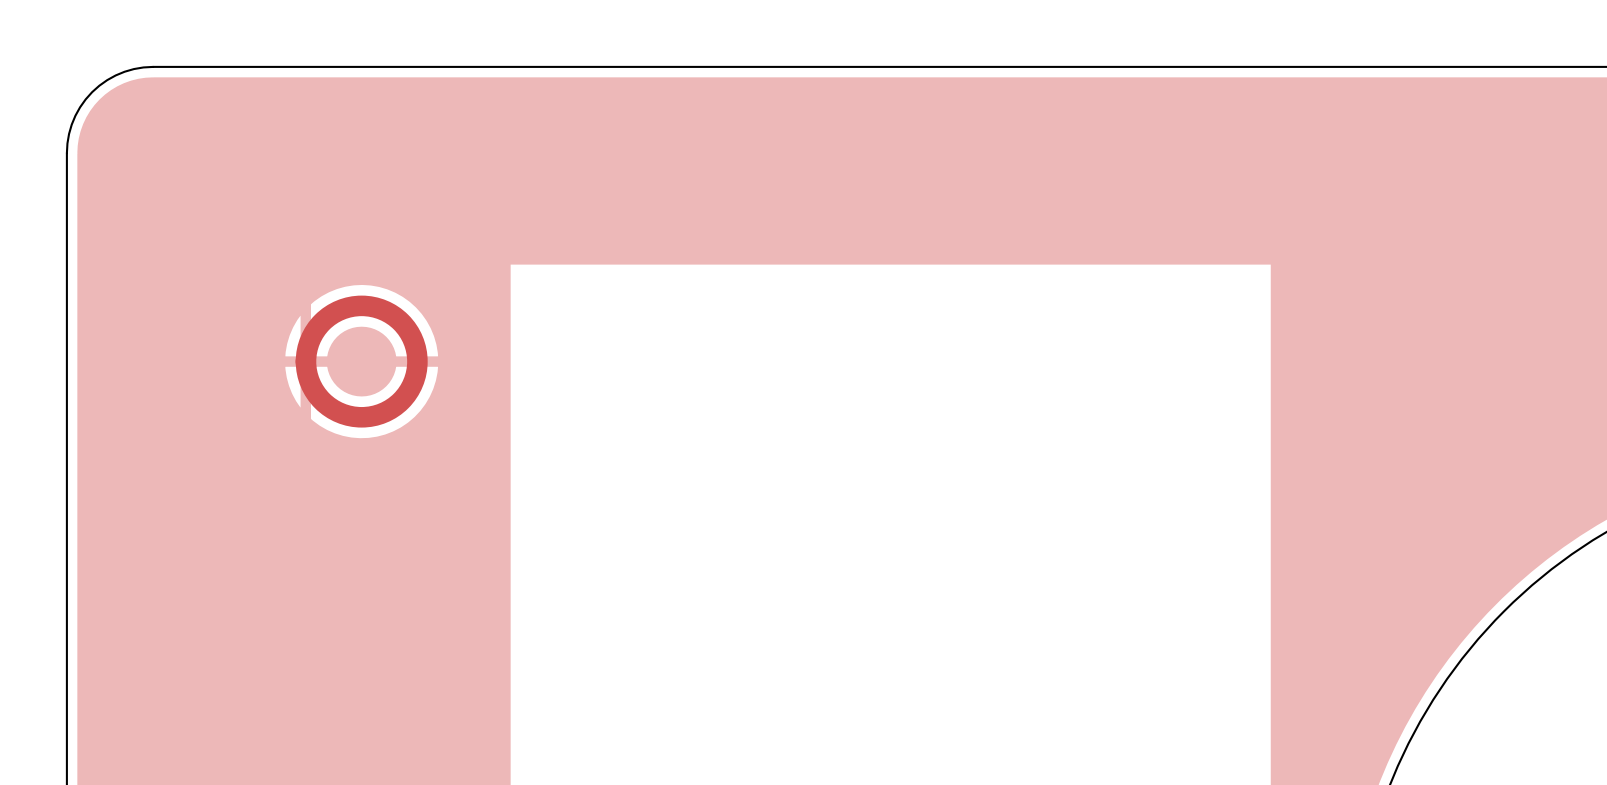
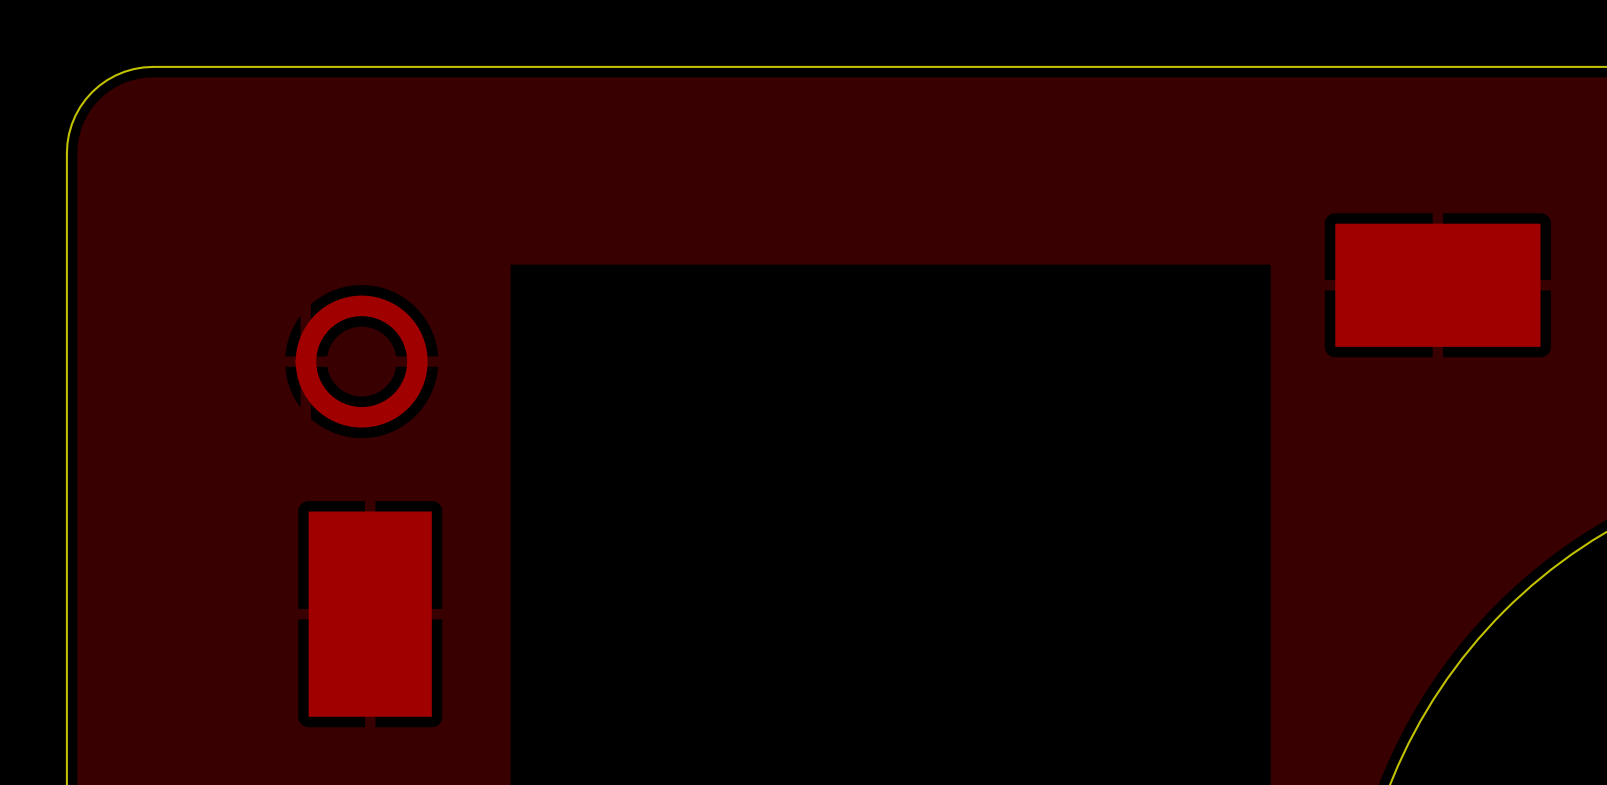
part: none -> (1437, 285)
part: none -> (370, 614)

